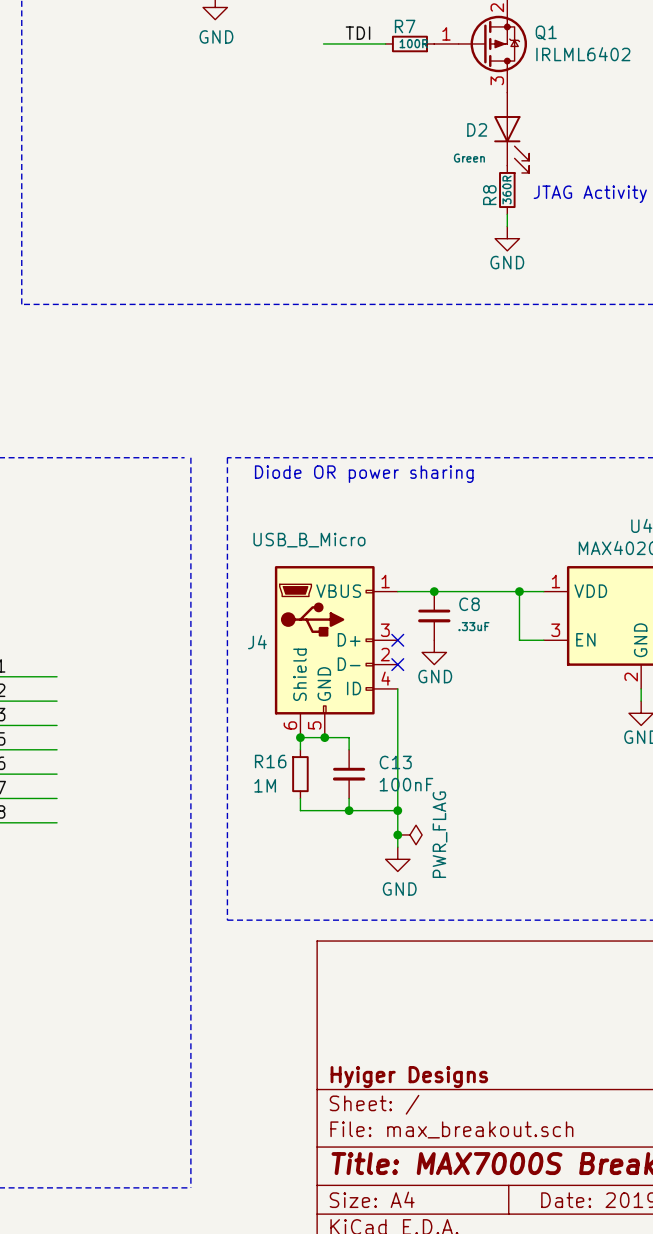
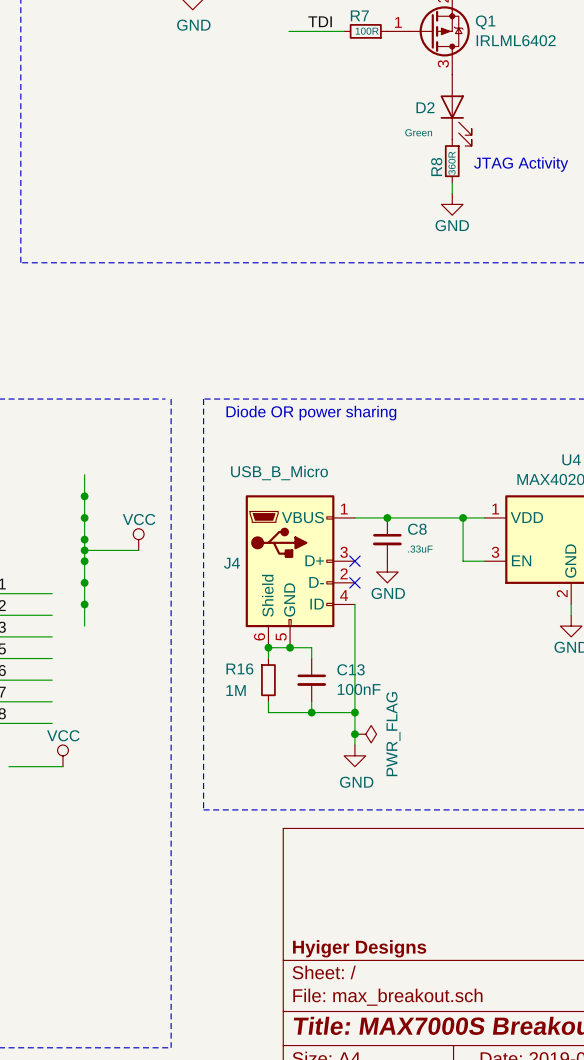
wire: none -> (84, 474) (84, 626)
junction: none -> (84, 496)
junction: none -> (84, 517)
junction: none -> (84, 539)
power symbol: none -> VCC (138, 539)
wire: none -> (84, 550) (138, 550)
junction: none -> (84, 550)
junction: none -> (84, 561)
junction: none -> (84, 582)
junction: none -> (84, 604)
power symbol: none -> VCC (62, 755)
wire: none -> (8, 766) (62, 766)

